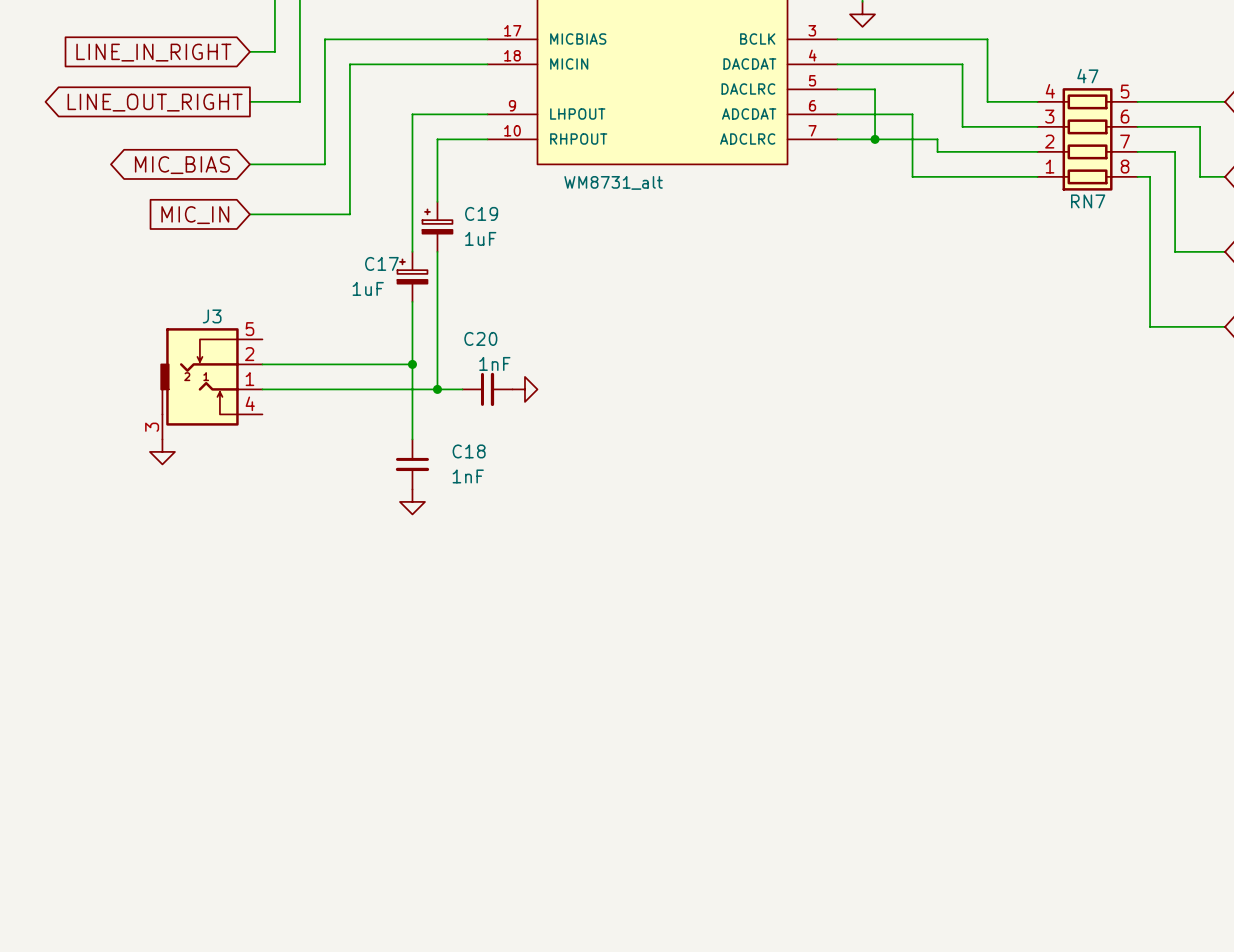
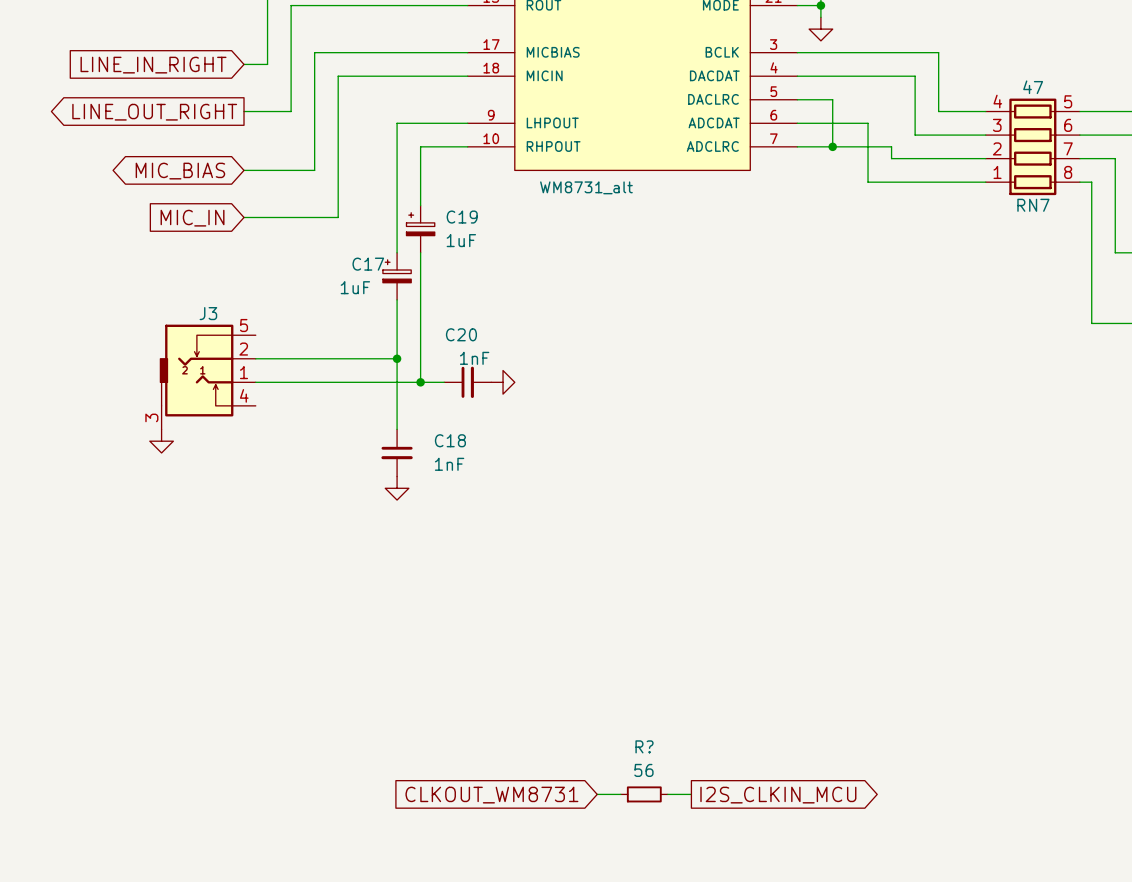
wire: none -> (597, 794) (620, 794)
R?: none -> 56 (644, 794)
wire: none -> (667, 794) (691, 794)
global label: none -> CLKOUT_WM8731 (491, 795)
global label: none -> I2S_CLKIN_MCU (778, 795)

